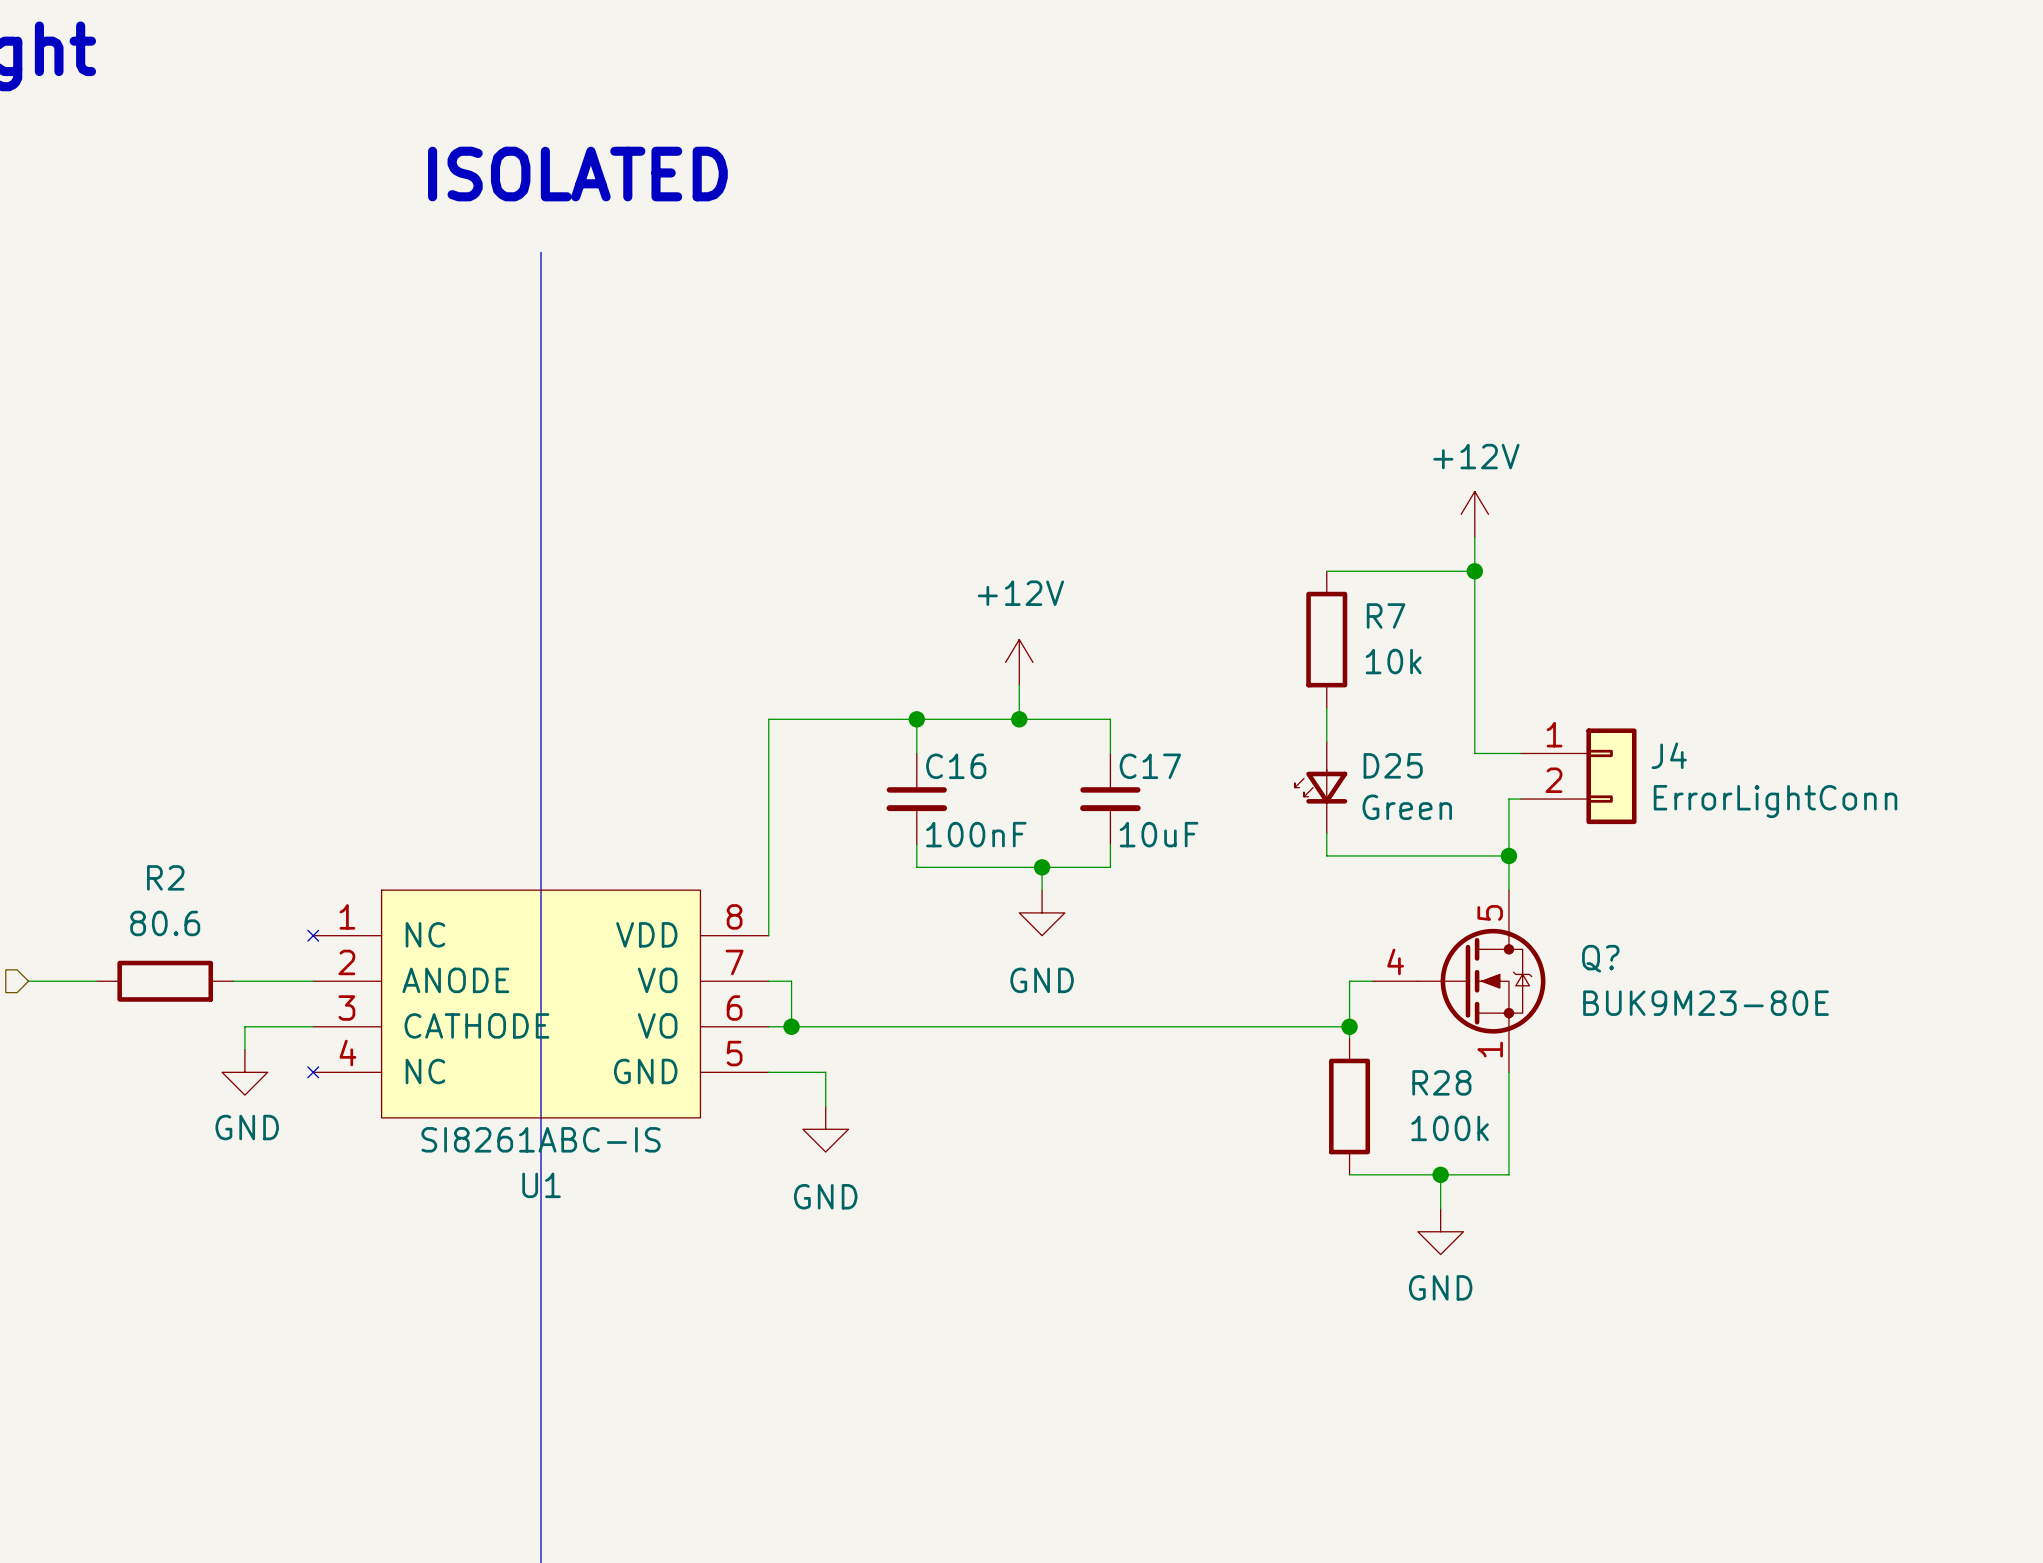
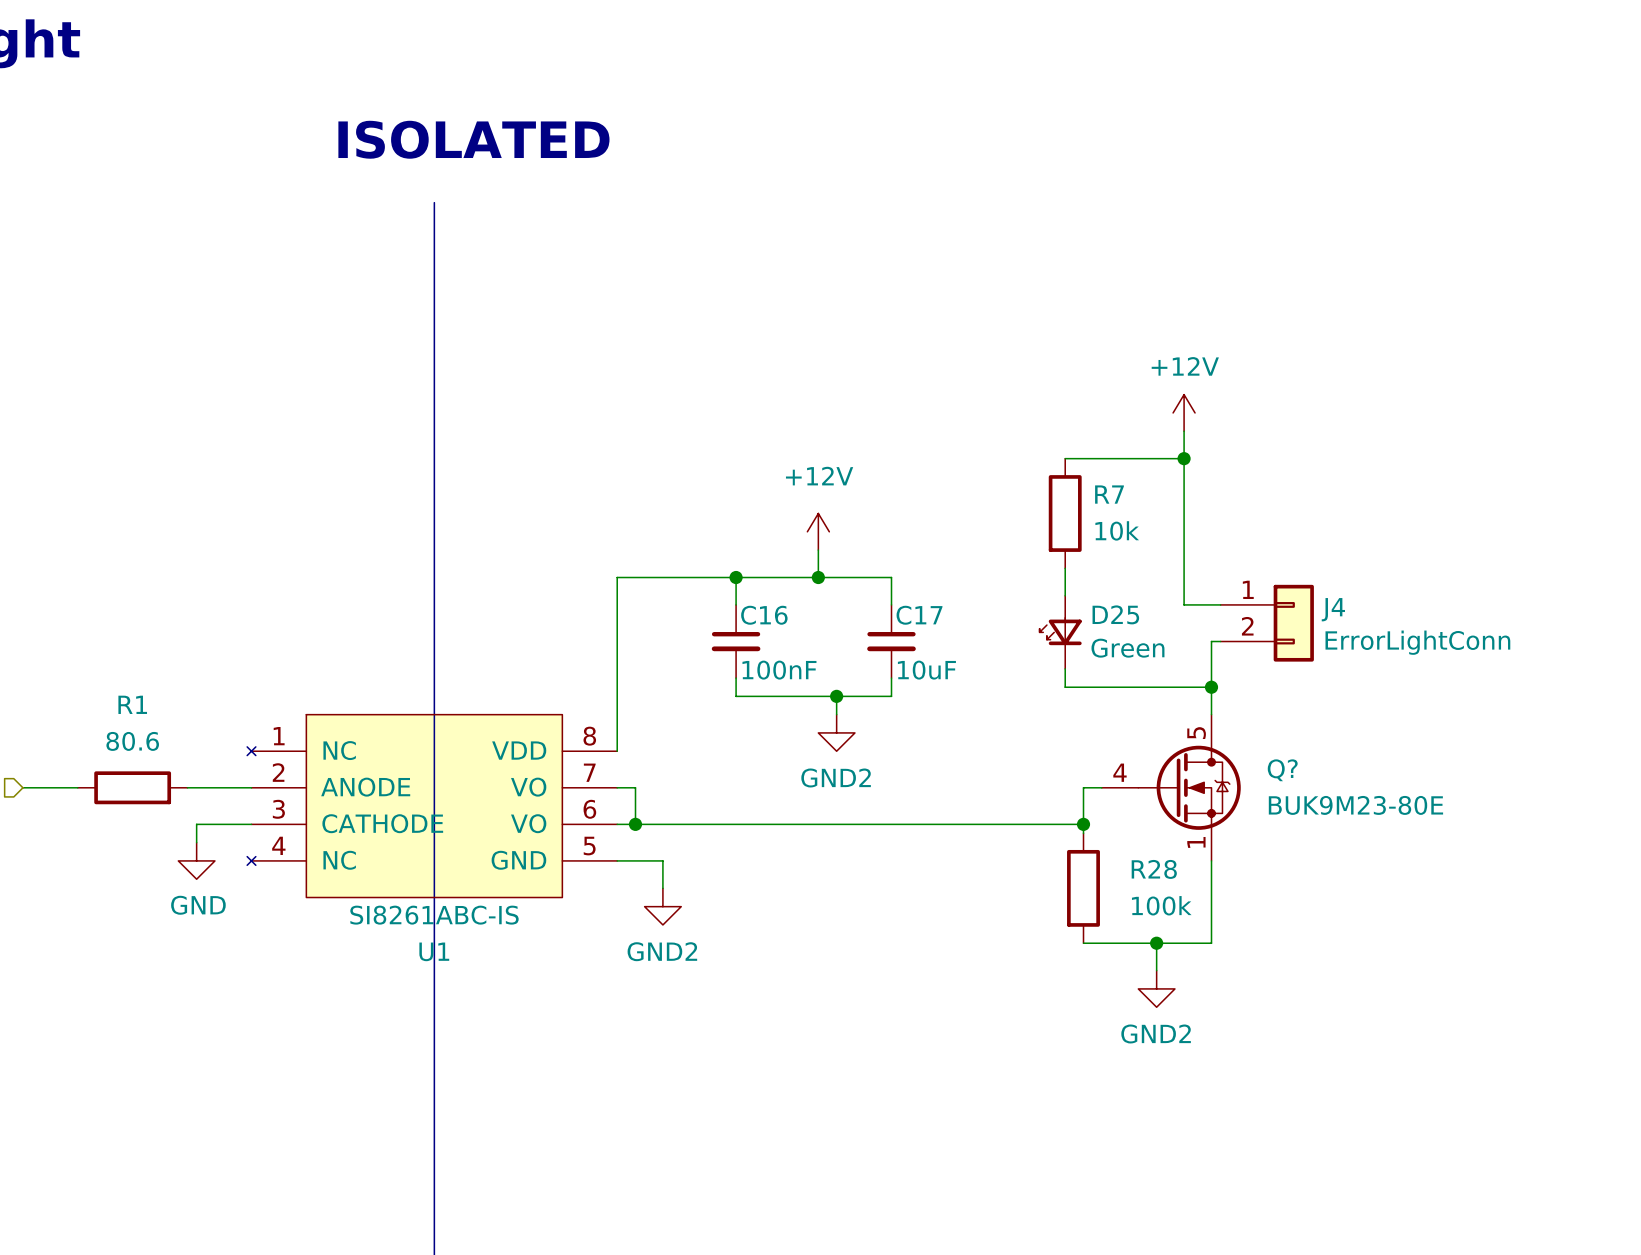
R2 name: R2 (165, 877) -> R1 (132, 704)
power symbol: GND (1042, 912) -> GND2 (836, 732)
power symbol: GND (825, 1129) -> GND2 (662, 906)
power symbol: GND (1440, 1231) -> GND2 (1156, 988)

